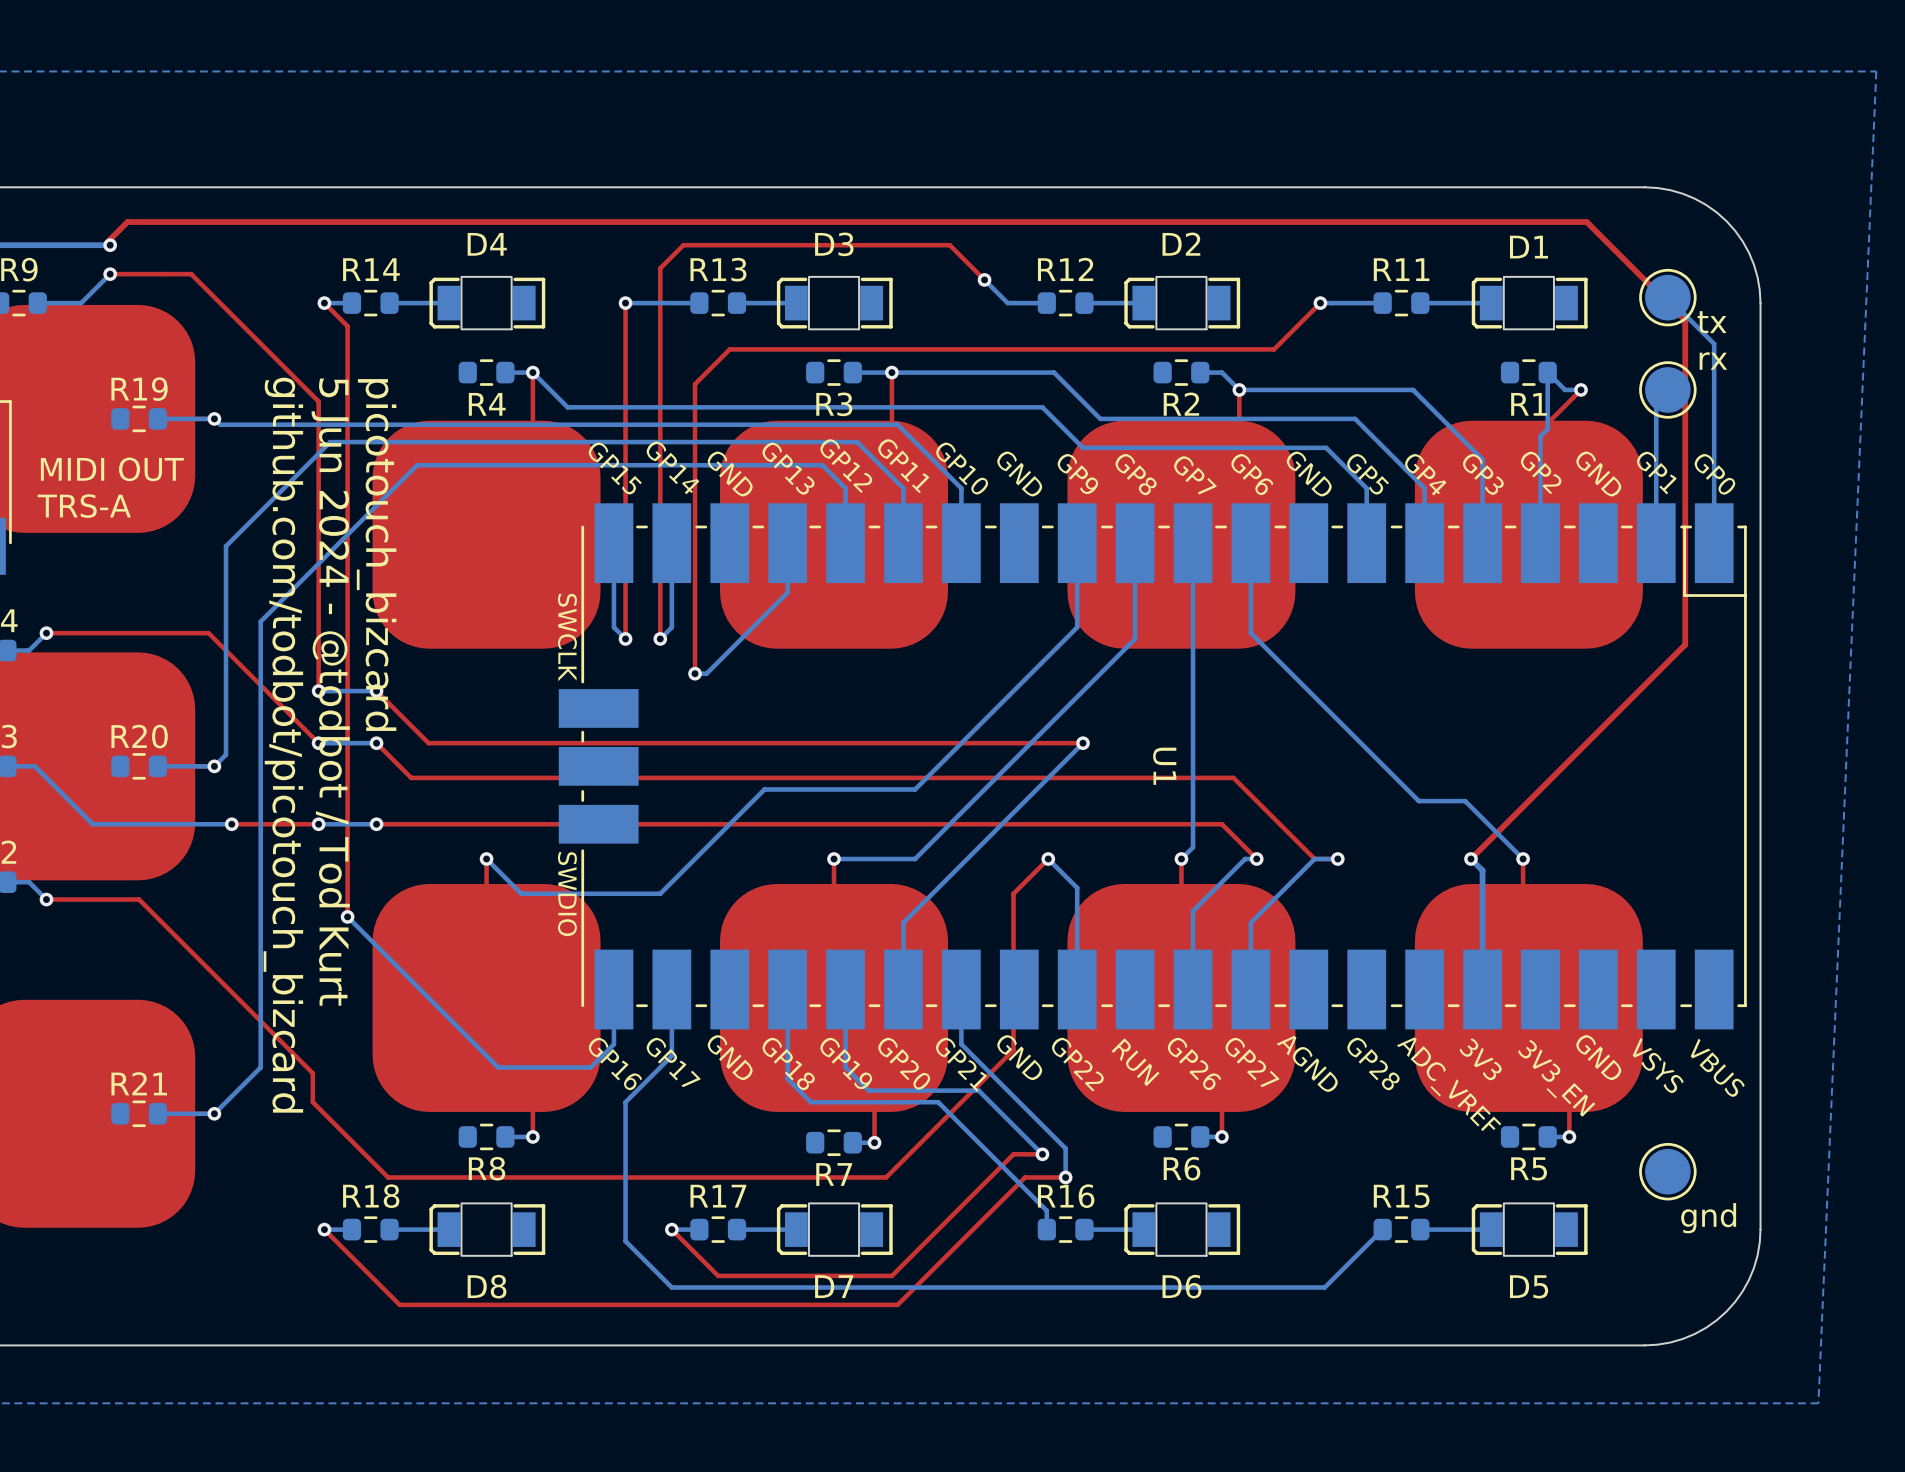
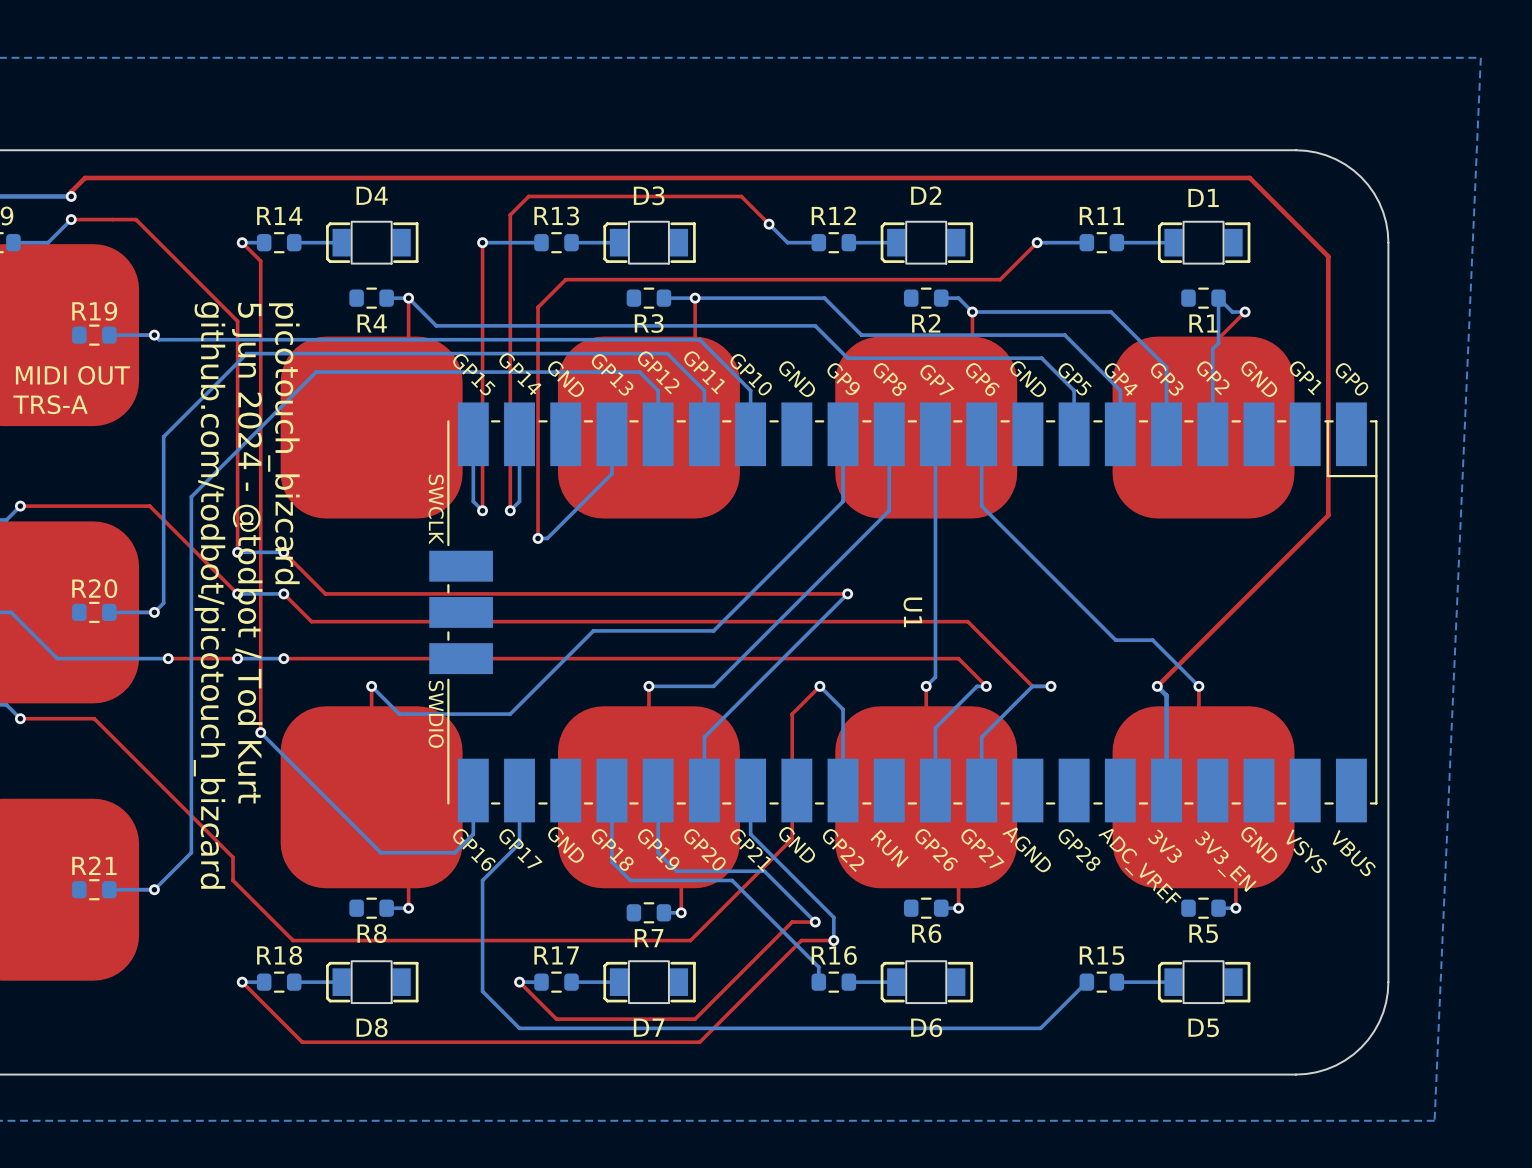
bottom track: (1667, 297) (1714, 343) (1714, 563) -> none
part: (1667, 297) -> none
text: tx (1712, 322) -> none
text: rx (1713, 361) -> none
bottom track: (1667, 389) (1656, 401) (1656, 563) -> none
part: (1667, 389) -> none
part: (1667, 1171) -> none
text: gnd (1708, 1218) -> none

